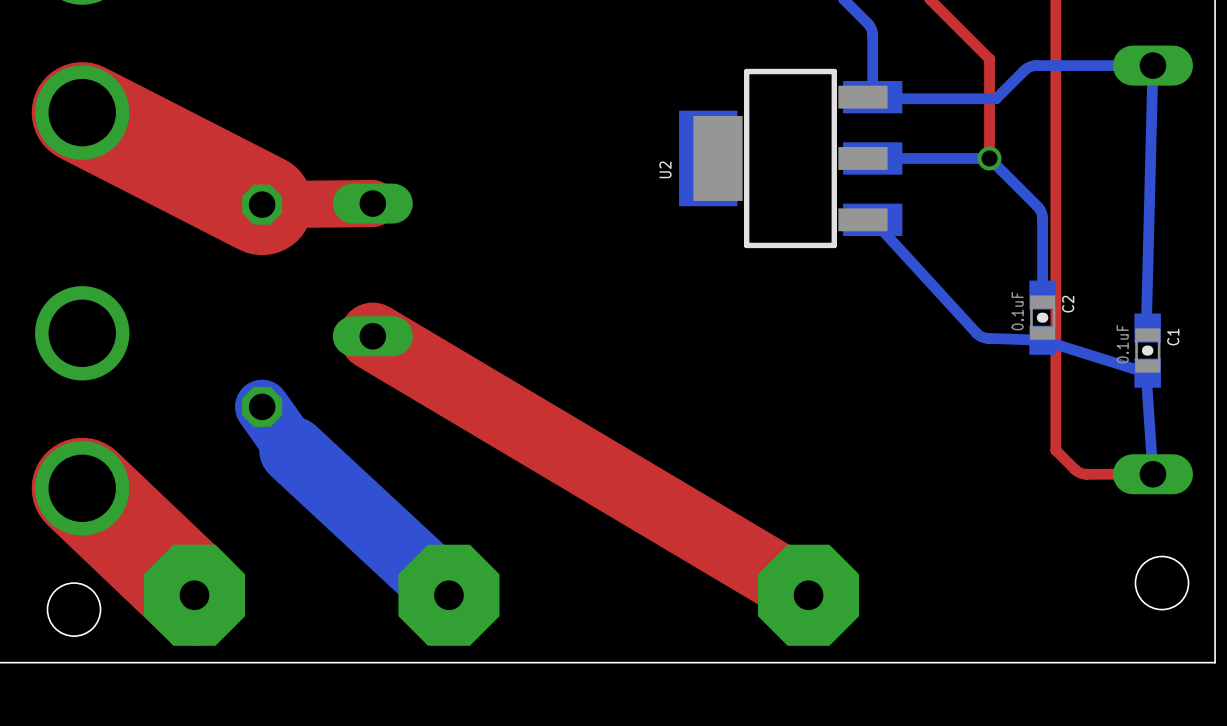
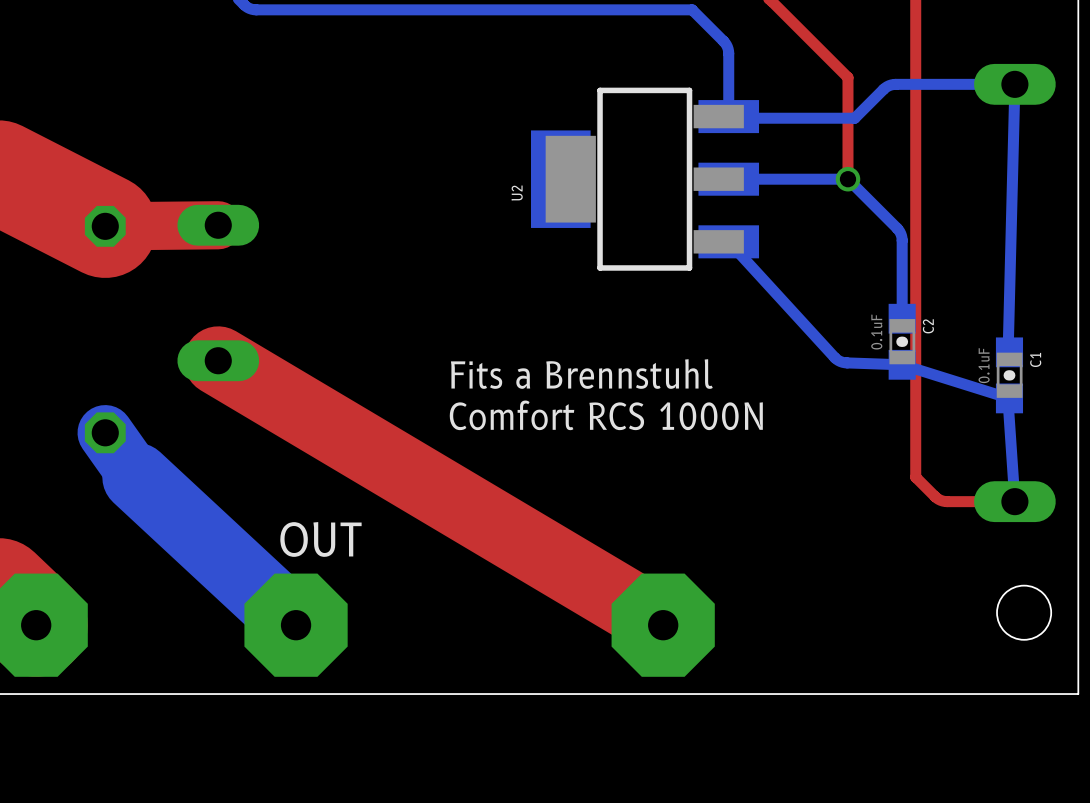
text: none -> Fits a Brennstuhl (581, 374)
text: none -> Comfort RCS 1000N (606, 415)
OUT name: none -> OUT (320, 539)

